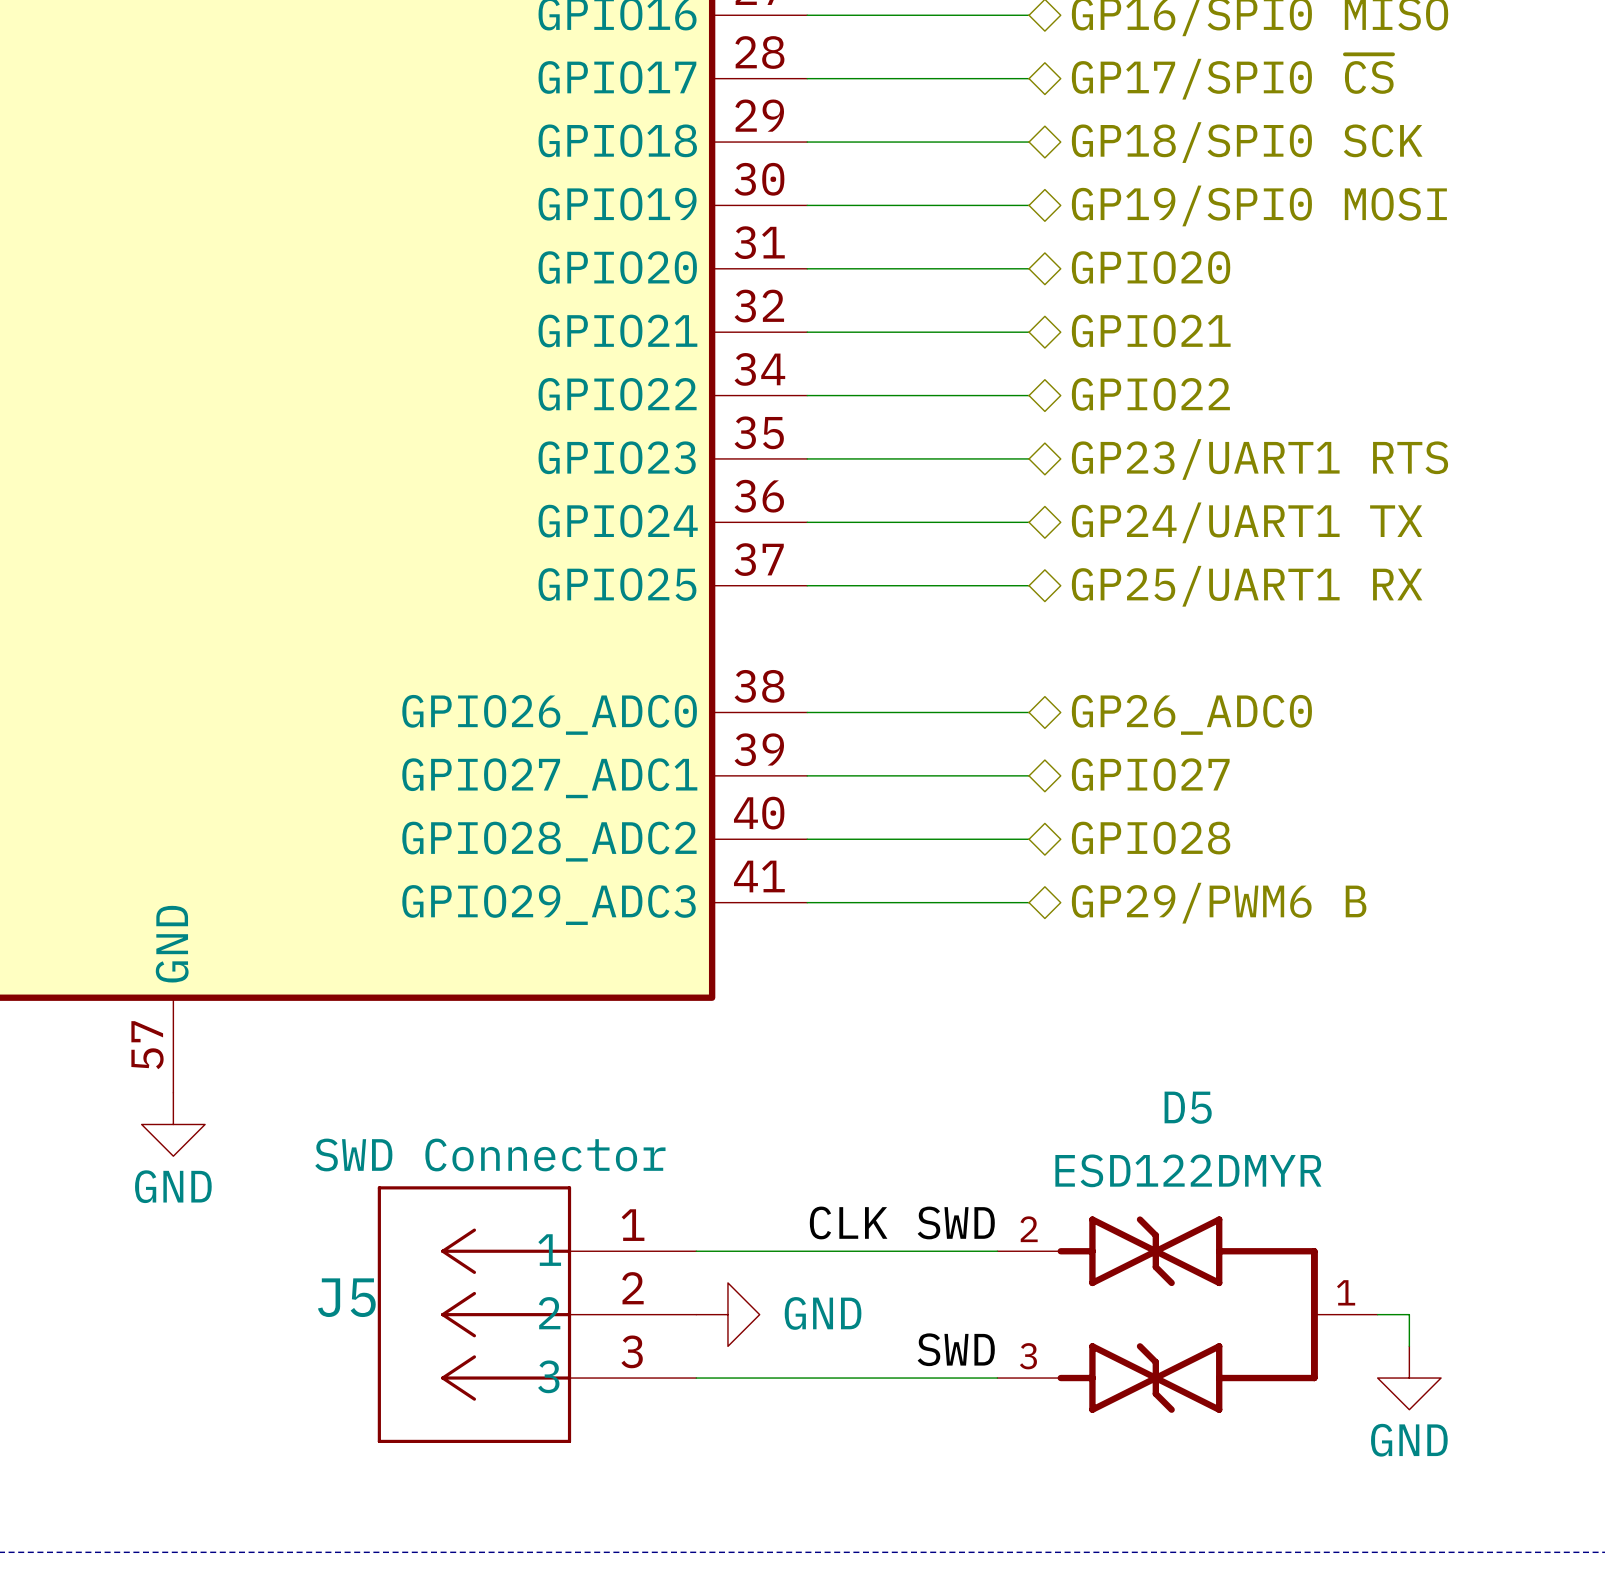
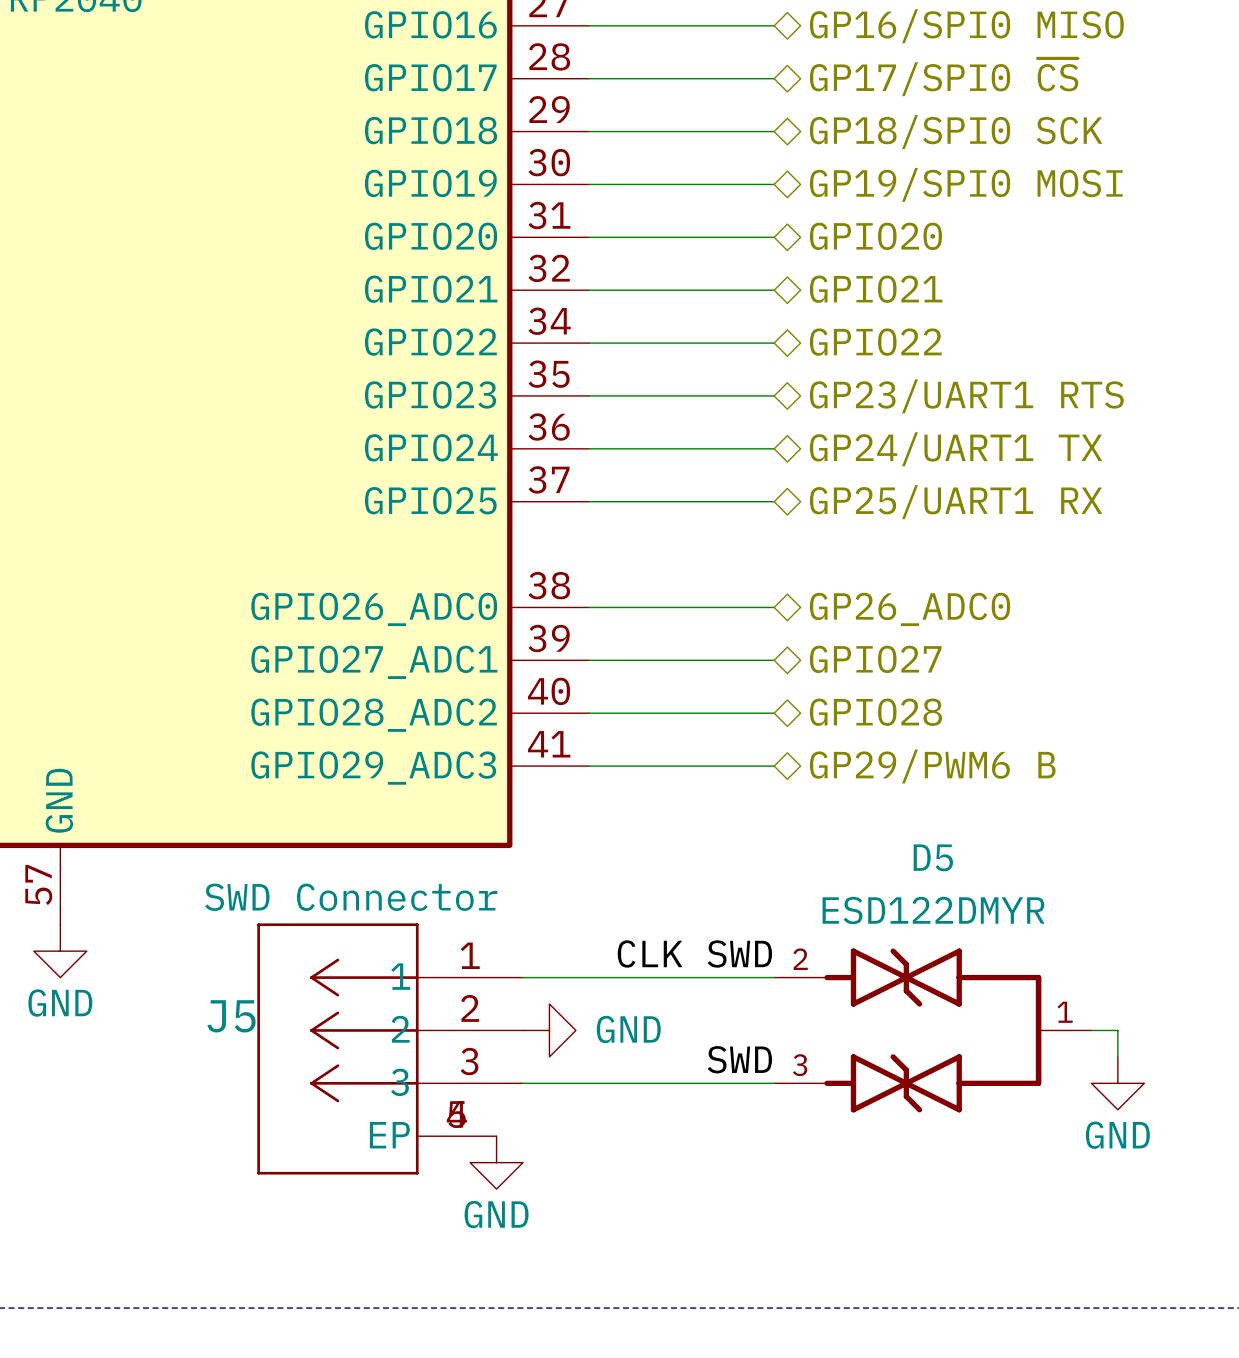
J5 symbol: [377, 1186, 697, 1443] -> [257, 923, 524, 1175]
power symbol: none -> GND (549, 1030)
label position: CLK SWD (902, 1222) -> CLK SWD (694, 953)
wire: (696, 1251) (997, 1251) -> (523, 1083) (774, 1083)
power symbol: GND (727, 1314) -> none
D5 position: (1187, 1314) -> (932, 1030)
wire: (1377, 1314) (1409, 1314) (1409, 1346) -> (1091, 1030) (1117, 1030) (1117, 1056)
label position: SWD (956, 1349) -> SWD (739, 1059)
wire: (696, 1378) (997, 1378) -> (523, 977) (774, 977)
power symbol: none -> GND (496, 1162)
power symbol position: GND (1409, 1378) -> GND (1117, 1083)

